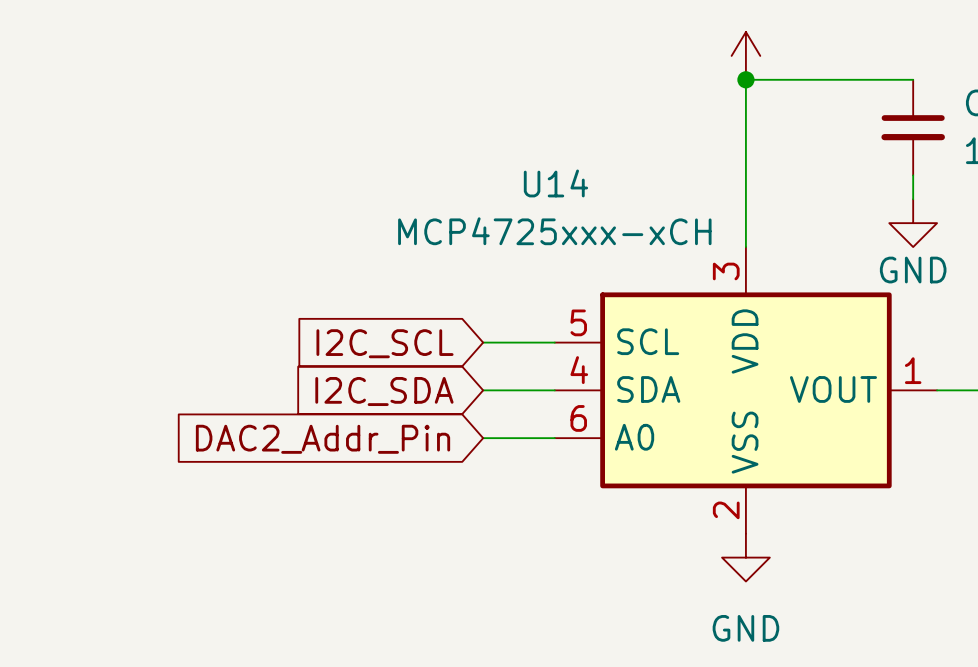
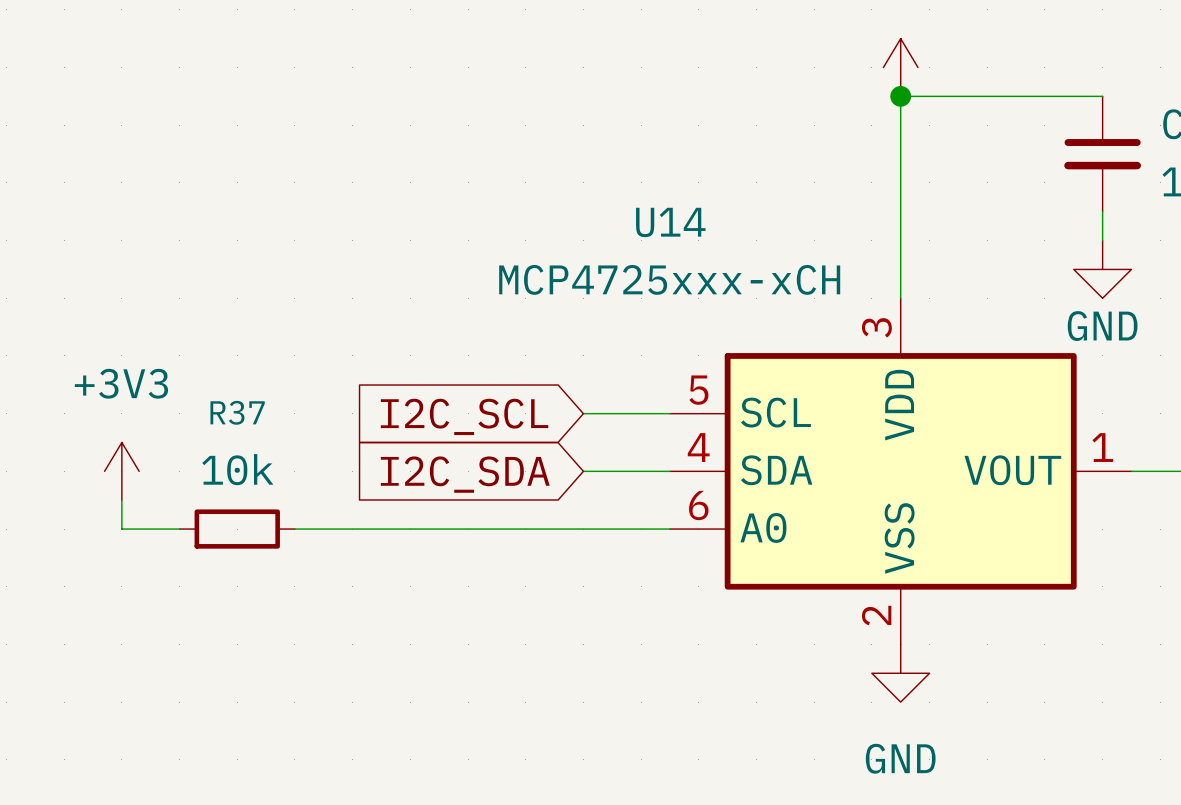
power symbol: none -> +3V3 (121, 471)
wire: none -> (121, 500) (121, 529) (179, 529)
R37: none -> 10k (237, 529)
wire: none -> (294, 529) (583, 529)
global label: DAC2_Addr_Pin (323, 439) -> none

